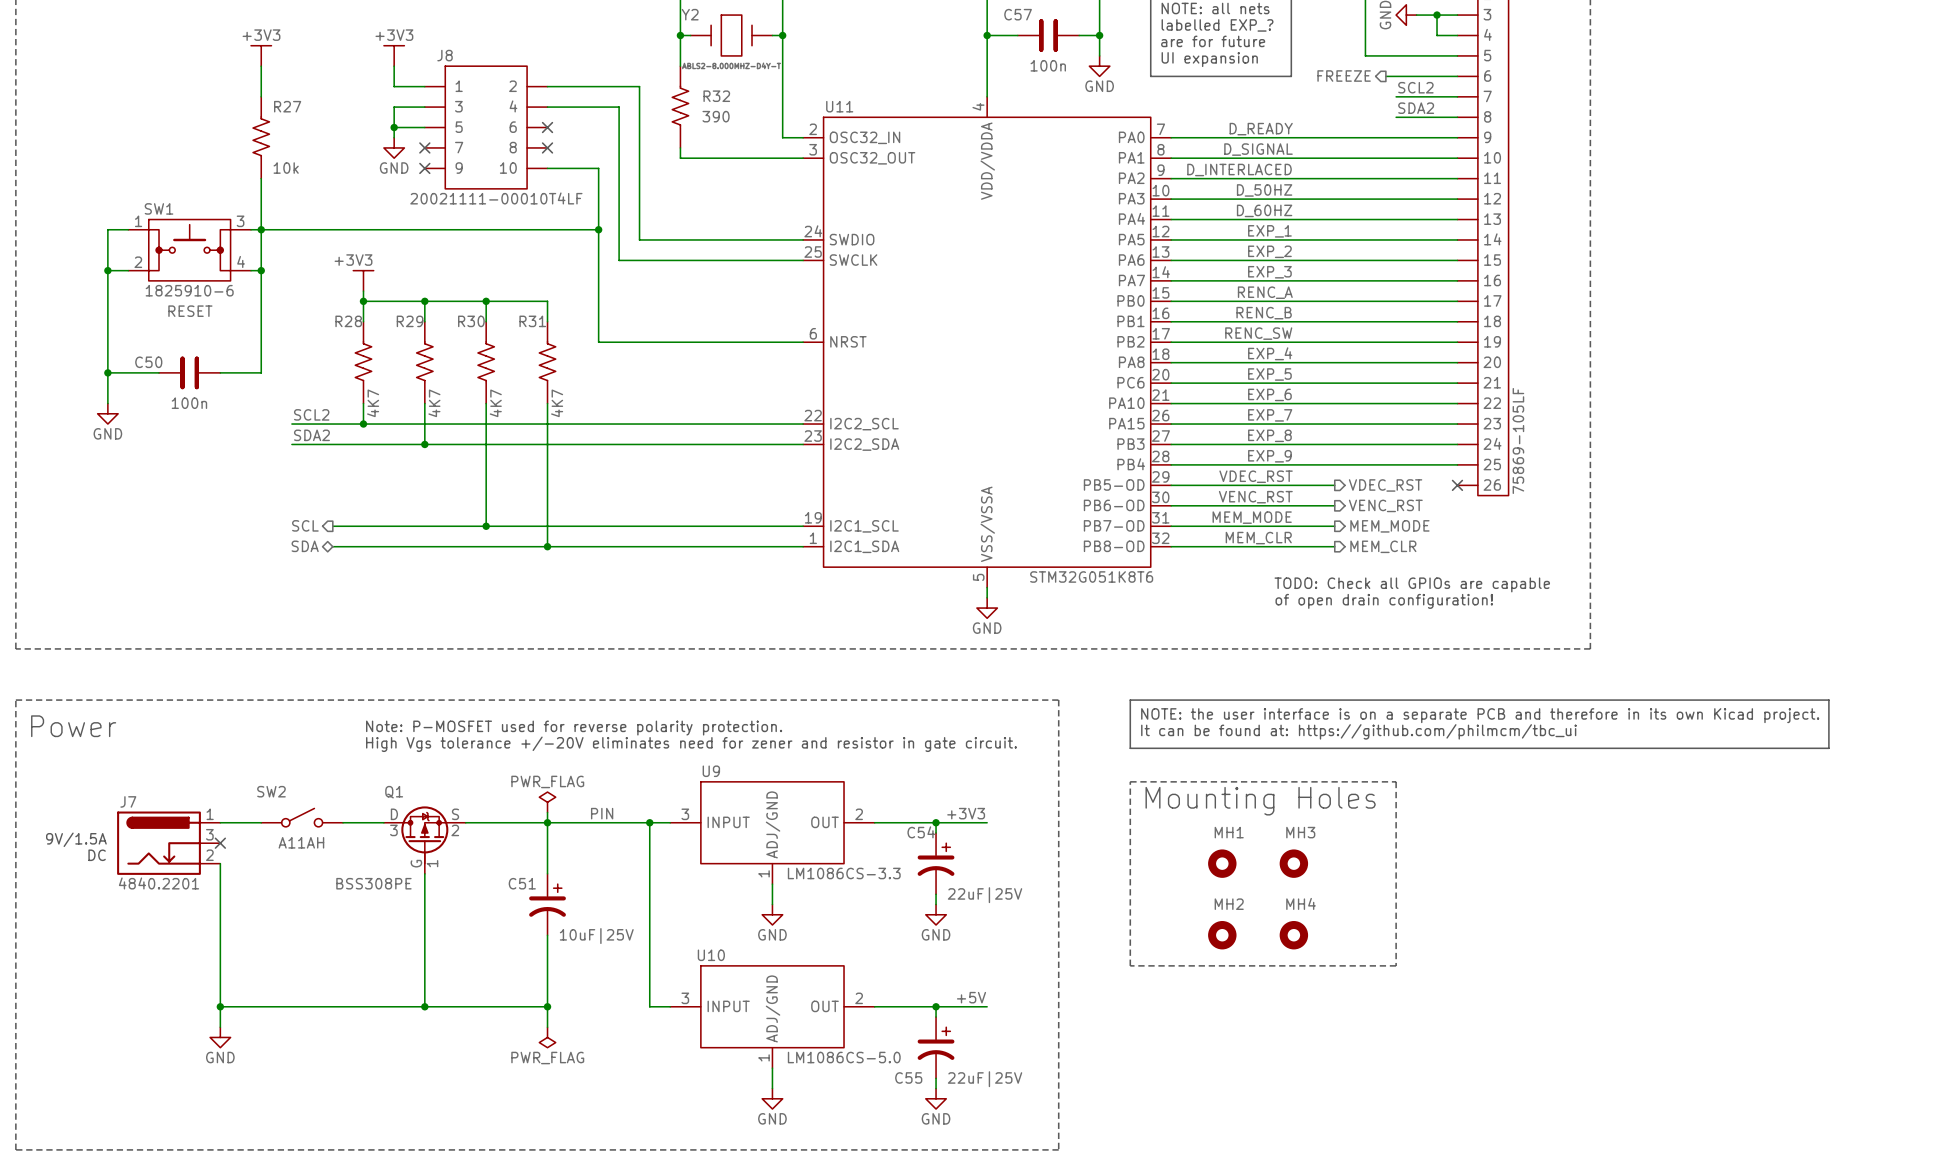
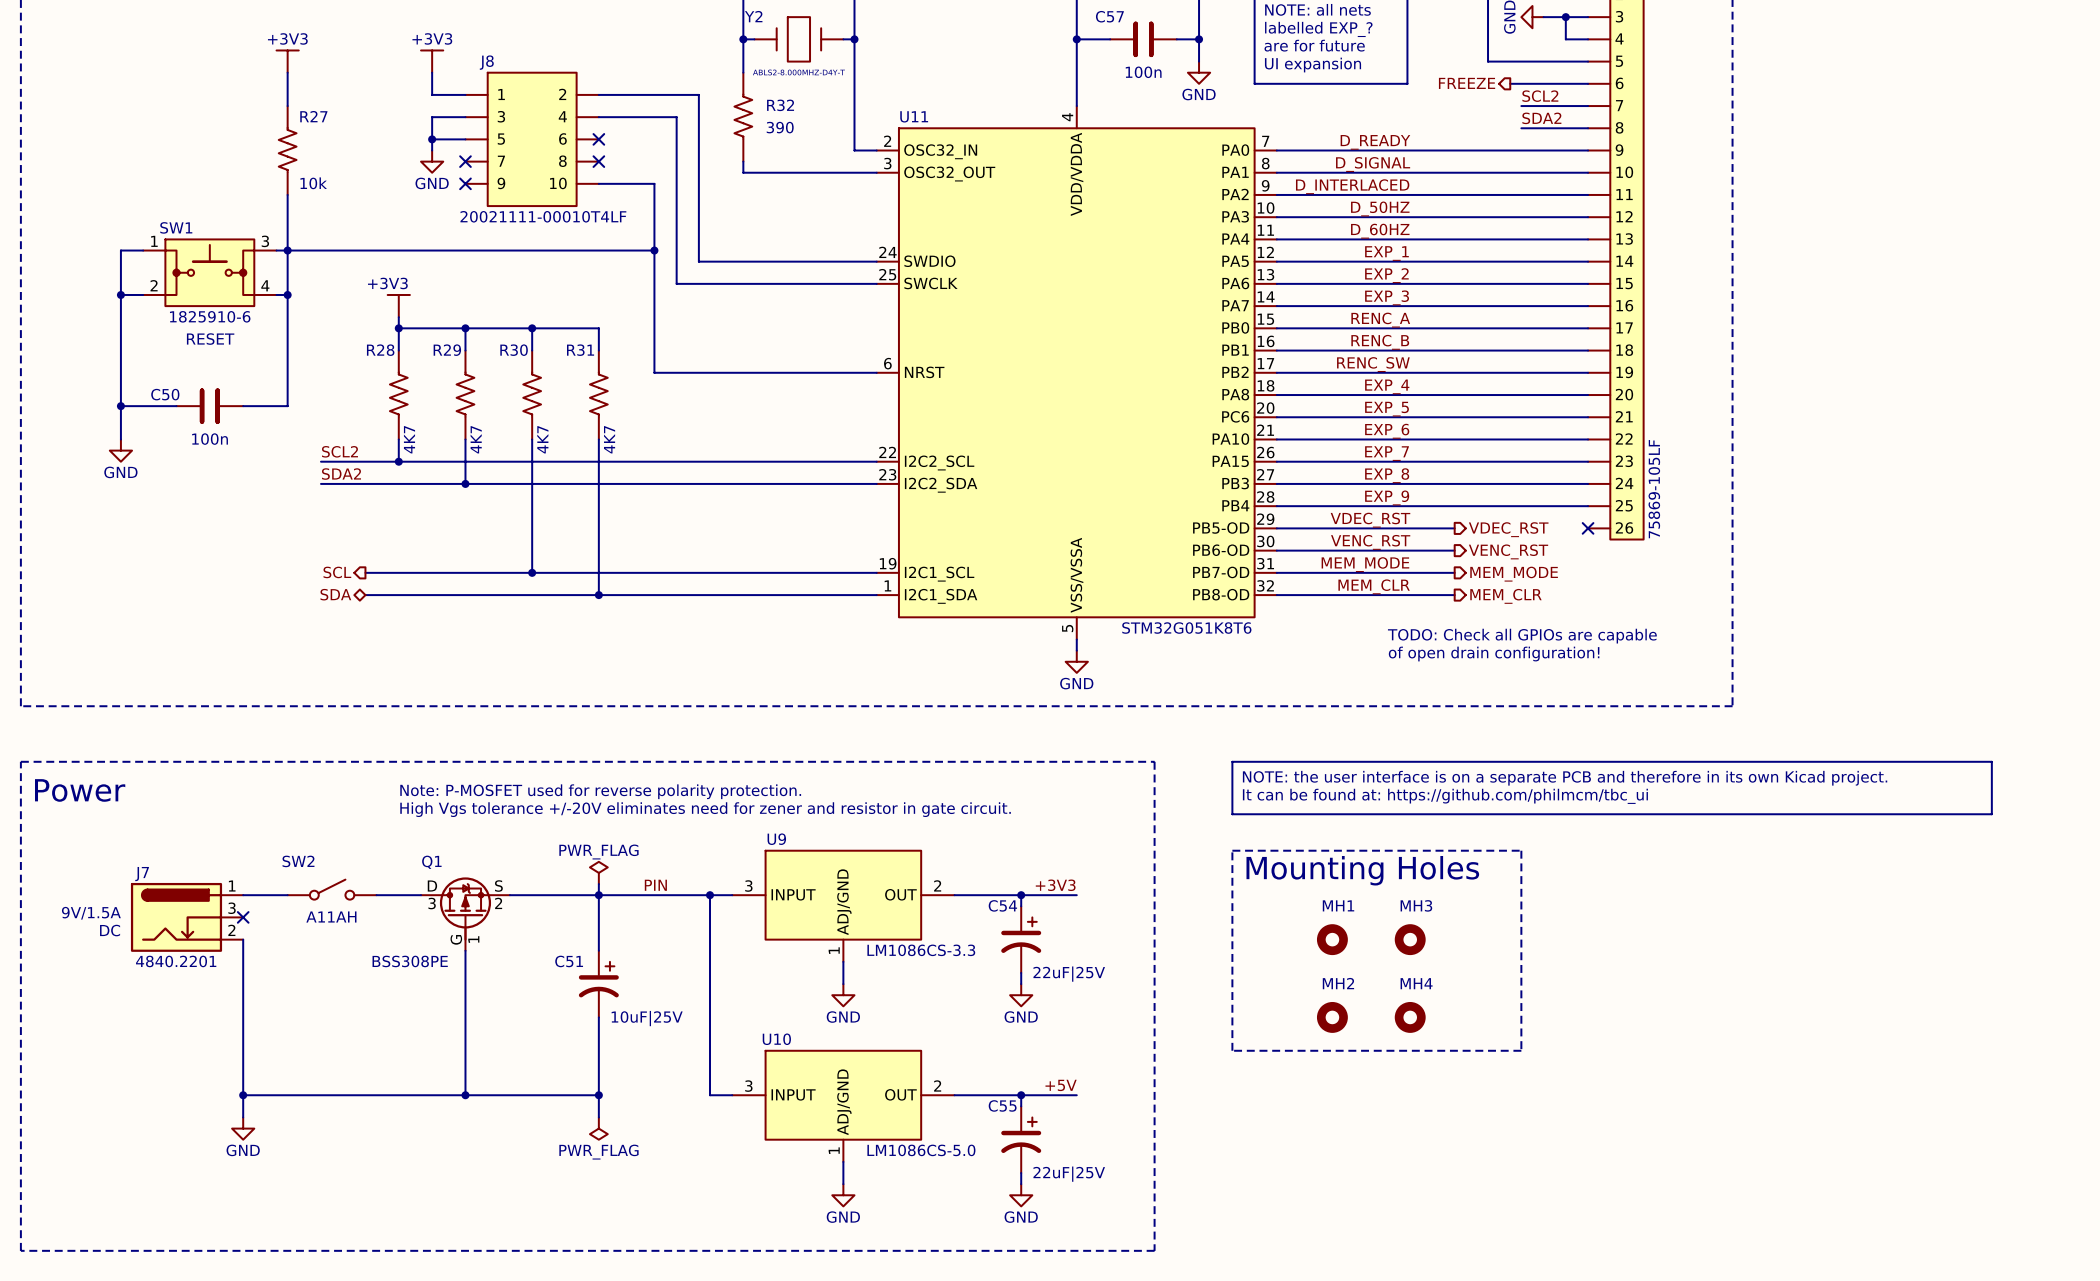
C55 name position: C55 (908, 1077) -> C55 (1002, 1105)

